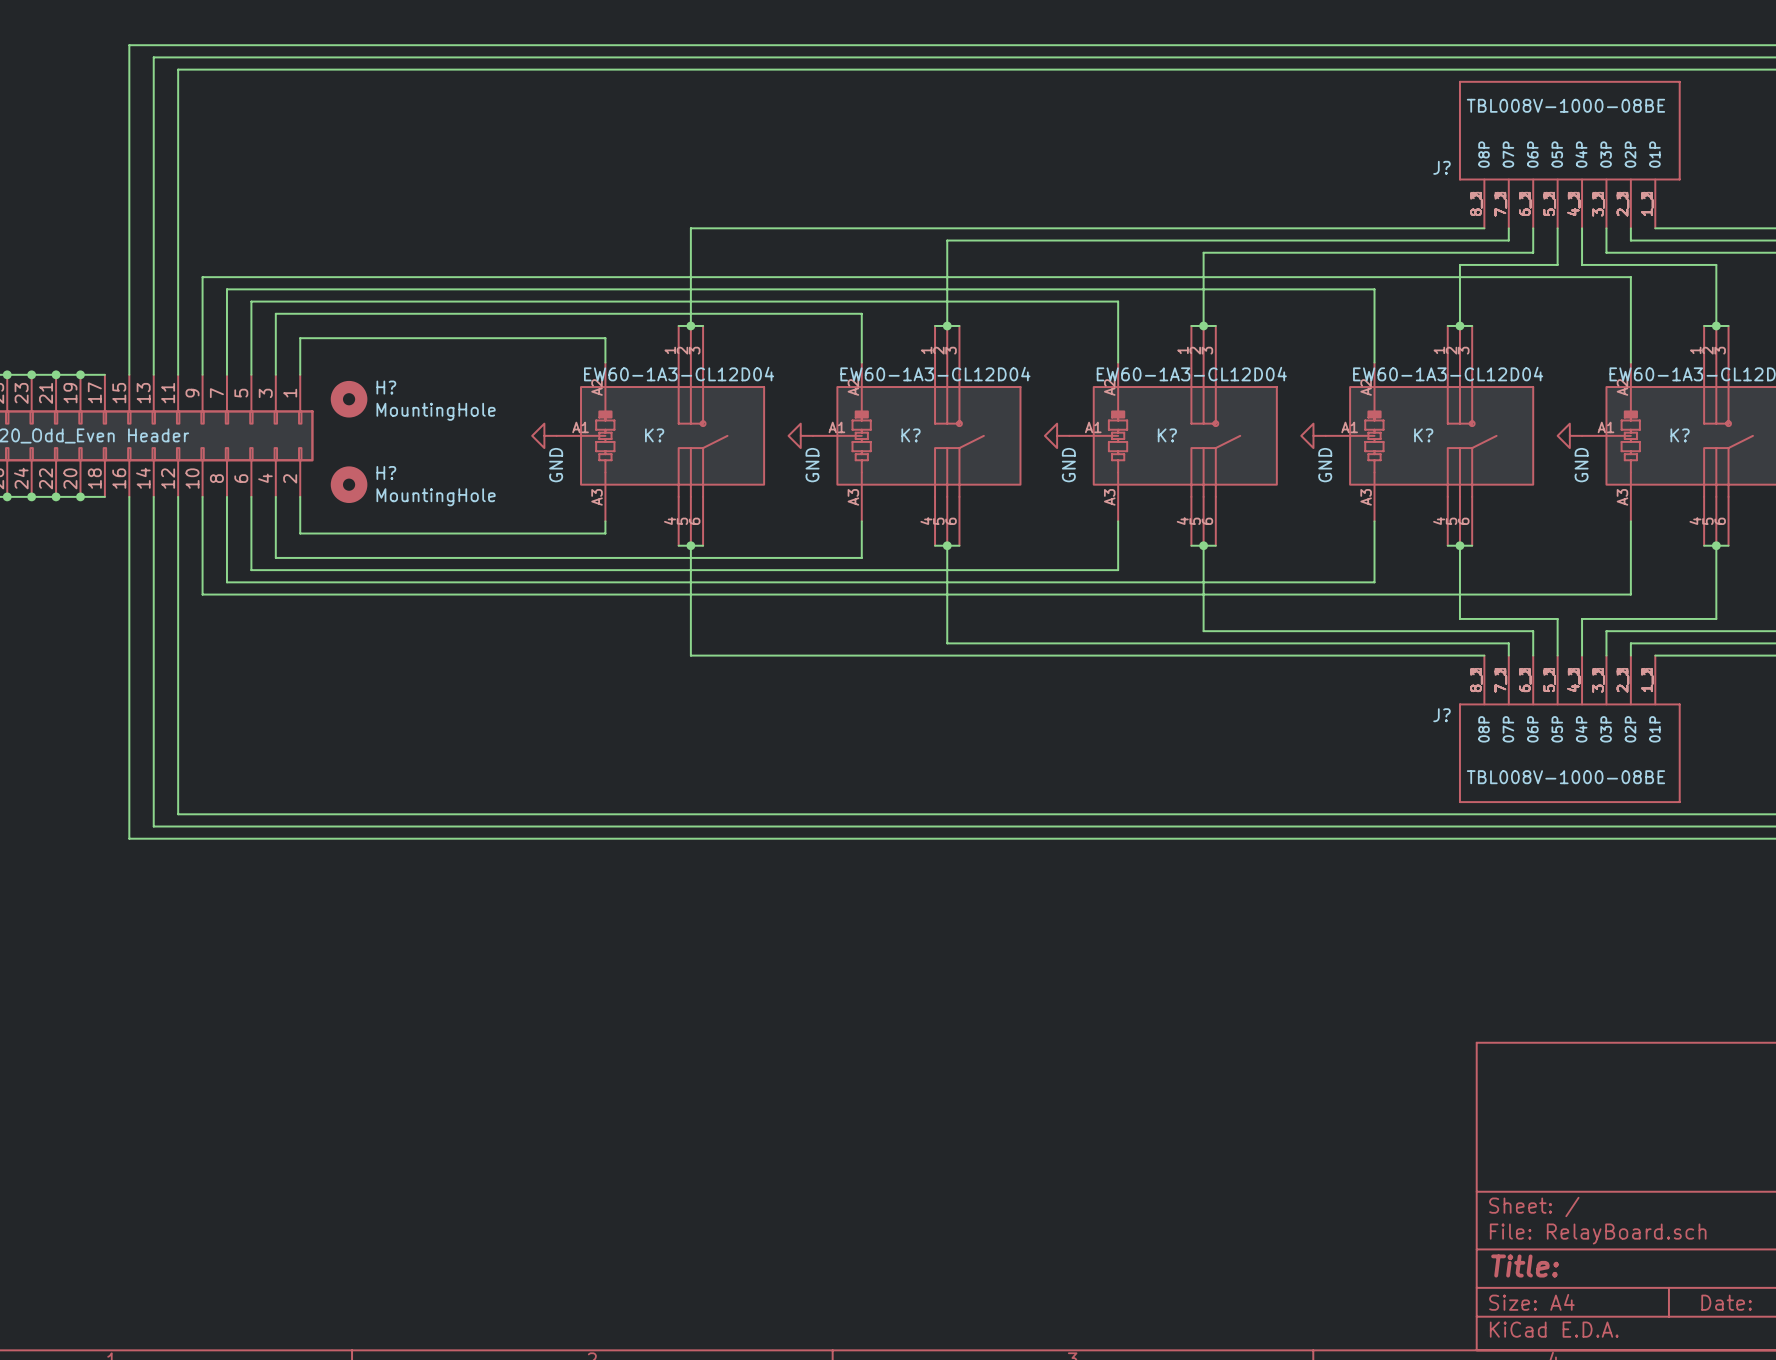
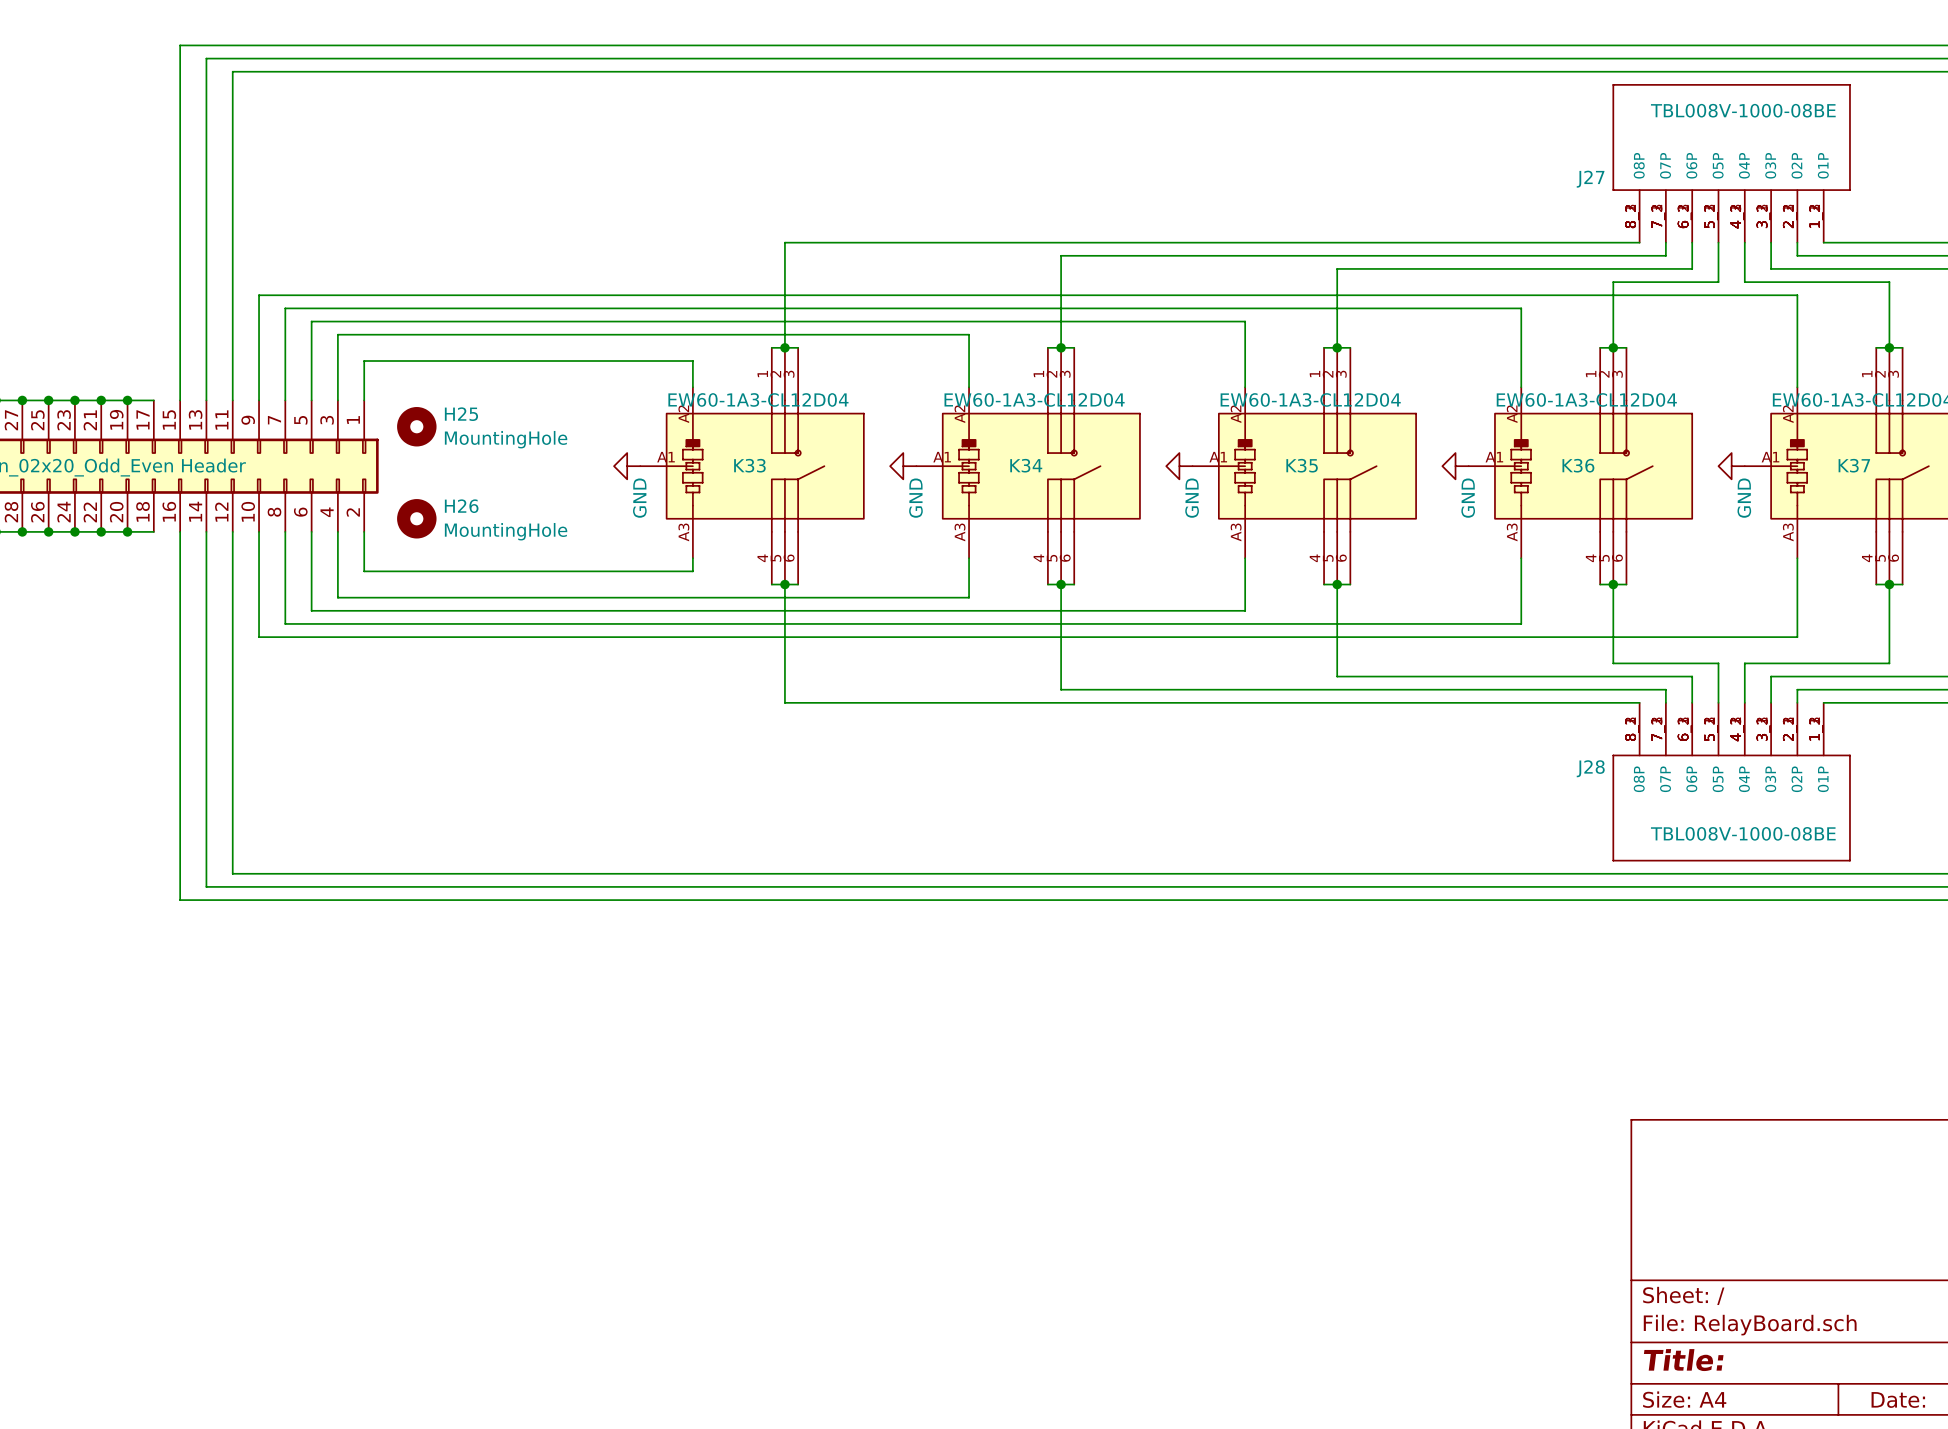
J? name: J? (1441, 167) -> J27 (1590, 179)
H? name: H? (386, 387) -> H25 (461, 414)
K? name: K? (654, 435) -> K33 (749, 465)
K? name: K? (911, 435) -> K34 (1026, 465)
K? name: K? (1167, 435) -> K35 (1302, 465)
K? name: K? (1423, 435) -> K36 (1578, 465)
K? name: K? (1680, 435) -> K37 (1854, 465)
H? name: H? (386, 473) -> H26 (461, 506)
J? name: J? (1441, 715) -> J28 (1590, 768)

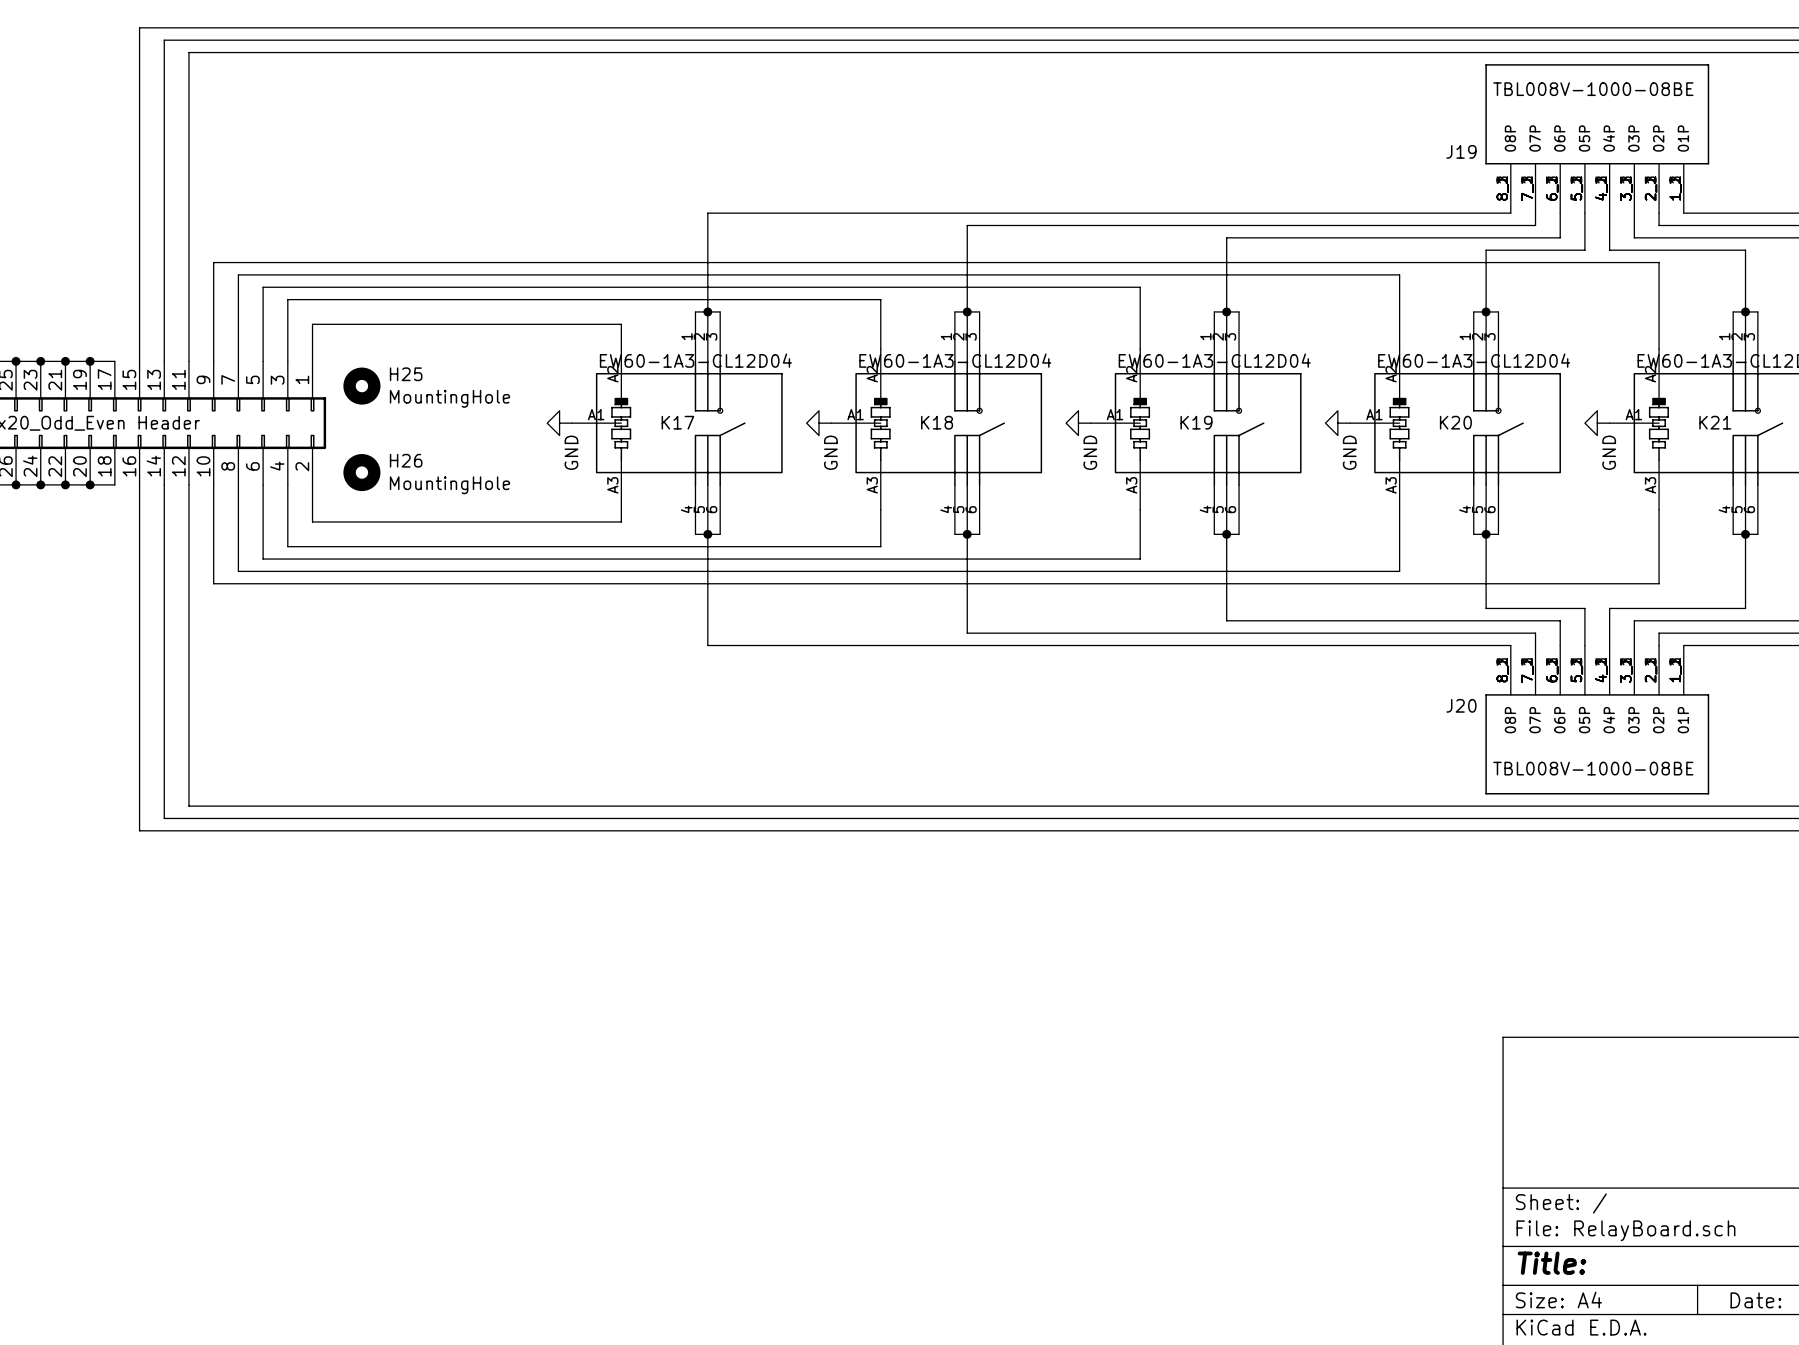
J27 name: J27 (1590, 179) -> J19 (1461, 151)
K33 name: K33 (749, 465) -> K17 (677, 422)
K34 name: K34 (1026, 465) -> K18 (937, 422)
K35 name: K35 (1302, 465) -> K19 (1196, 422)
K36 name: K36 (1578, 465) -> K20 (1455, 422)
K37 name: K37 (1854, 465) -> K21 (1715, 422)
J28 name: J28 (1590, 768) -> J20 (1461, 705)

